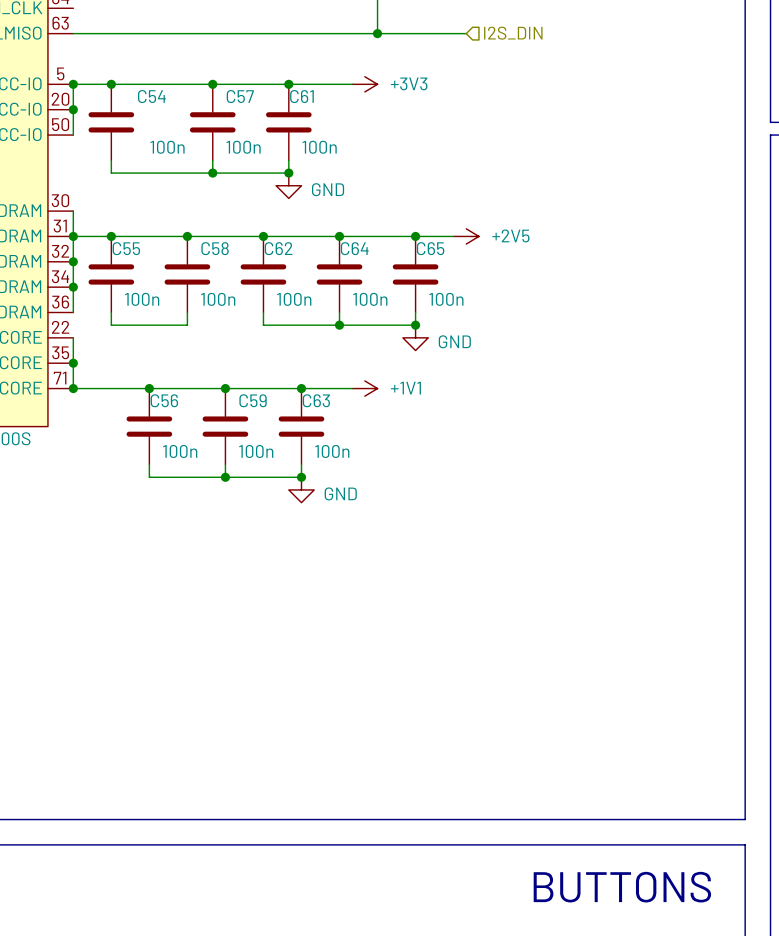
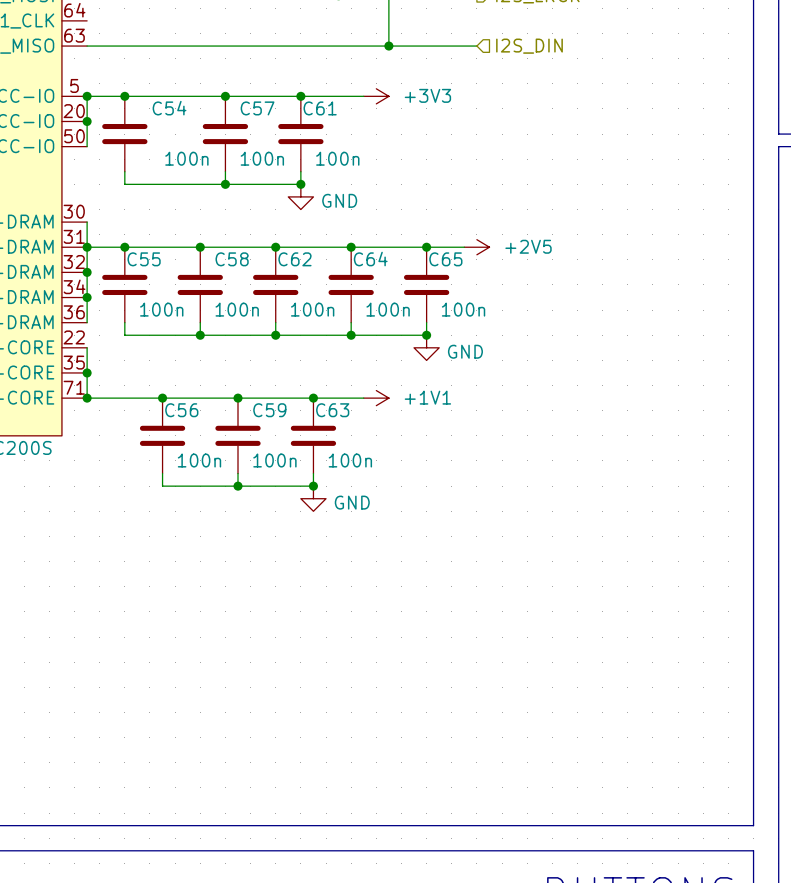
wire: none -> (200, 335) (275, 335)
junction: none -> (200, 335)
junction: none -> (275, 335)

